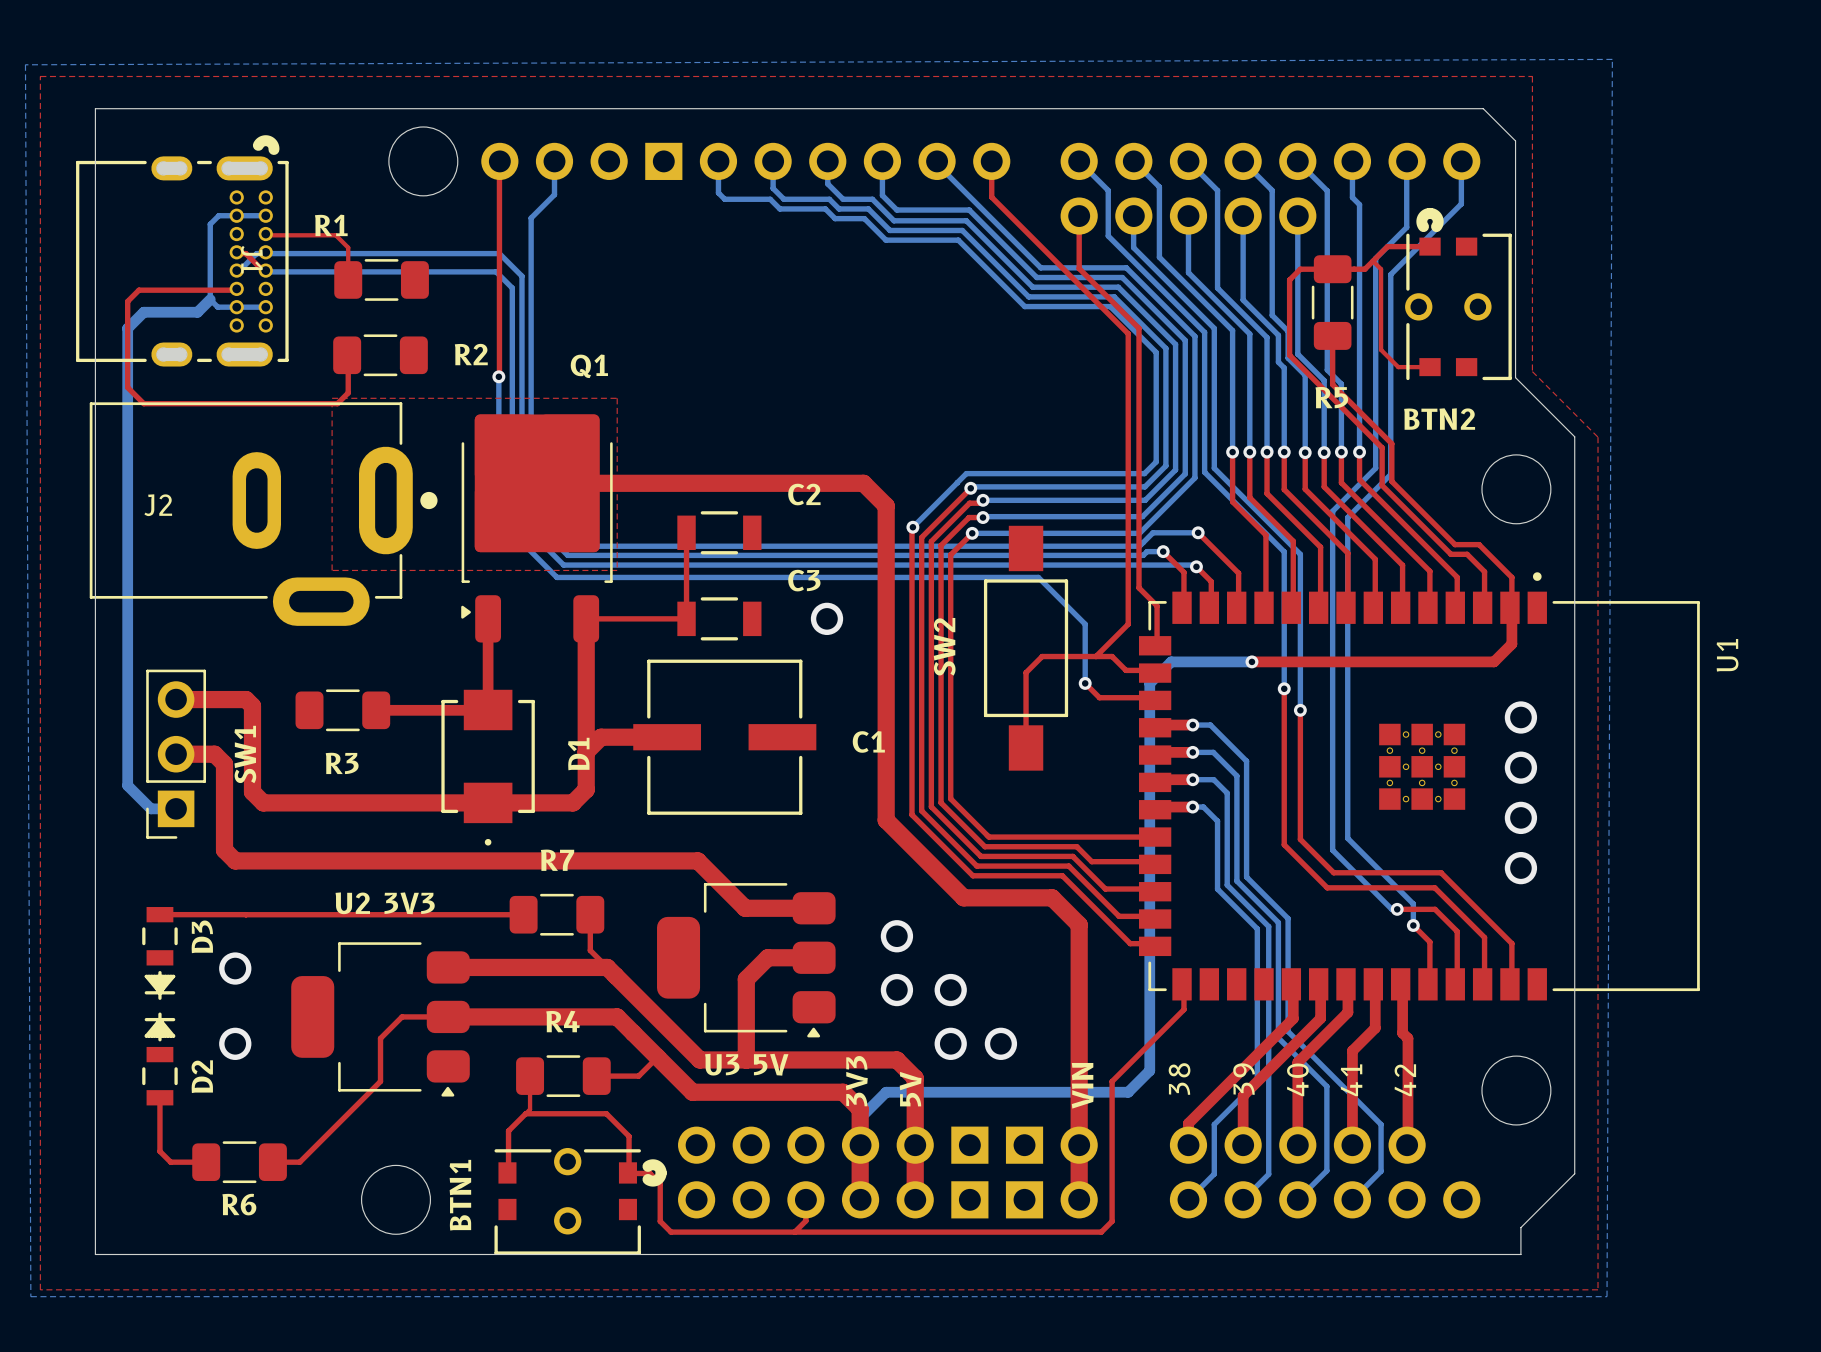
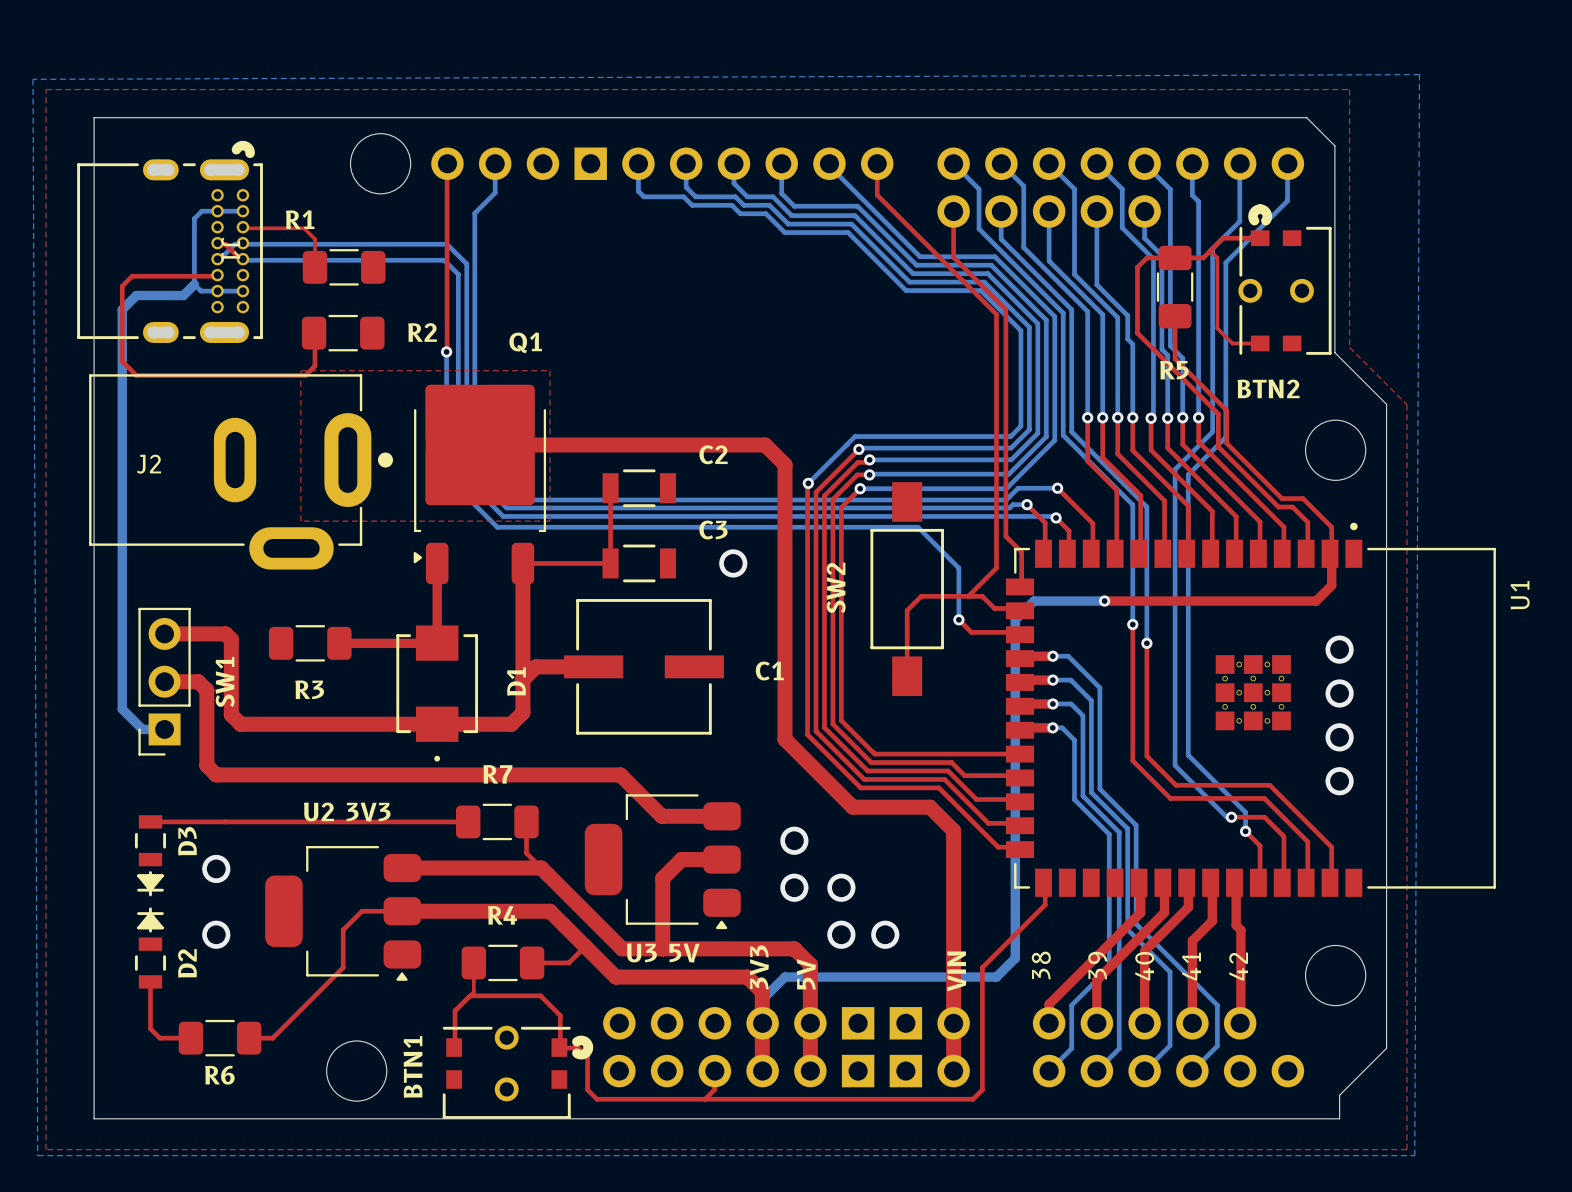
bottom track: (1272, 234) (1272, 315) (1288, 331) (1288, 358) (1305, 375) (1305, 452) -> (1122, 227) (1153, 259) (1153, 415) (1151, 417)
bottom track: (1297, 246) (1297, 354) (1317, 373) -> (1144, 238) (1161, 255) (1161, 349)

